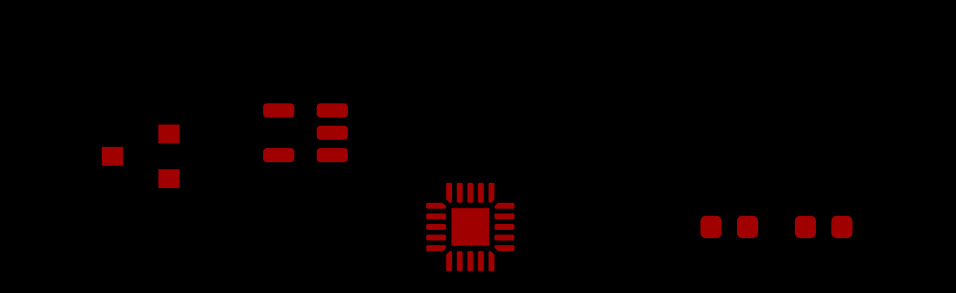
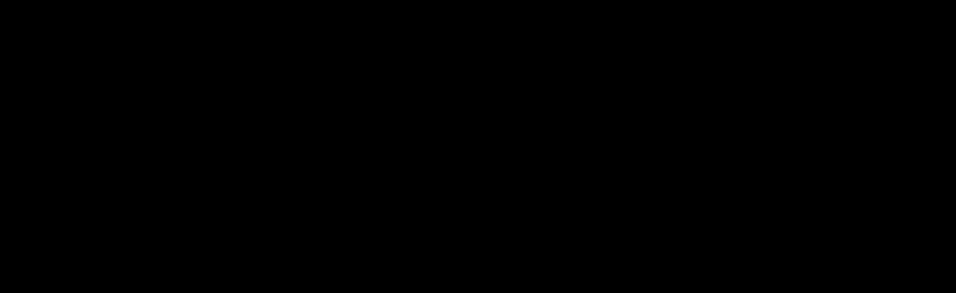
part: (305, 132) -> none
part: (140, 156) -> none
part: (470, 226) -> none
part: (729, 226) -> none
part: (823, 226) -> none

